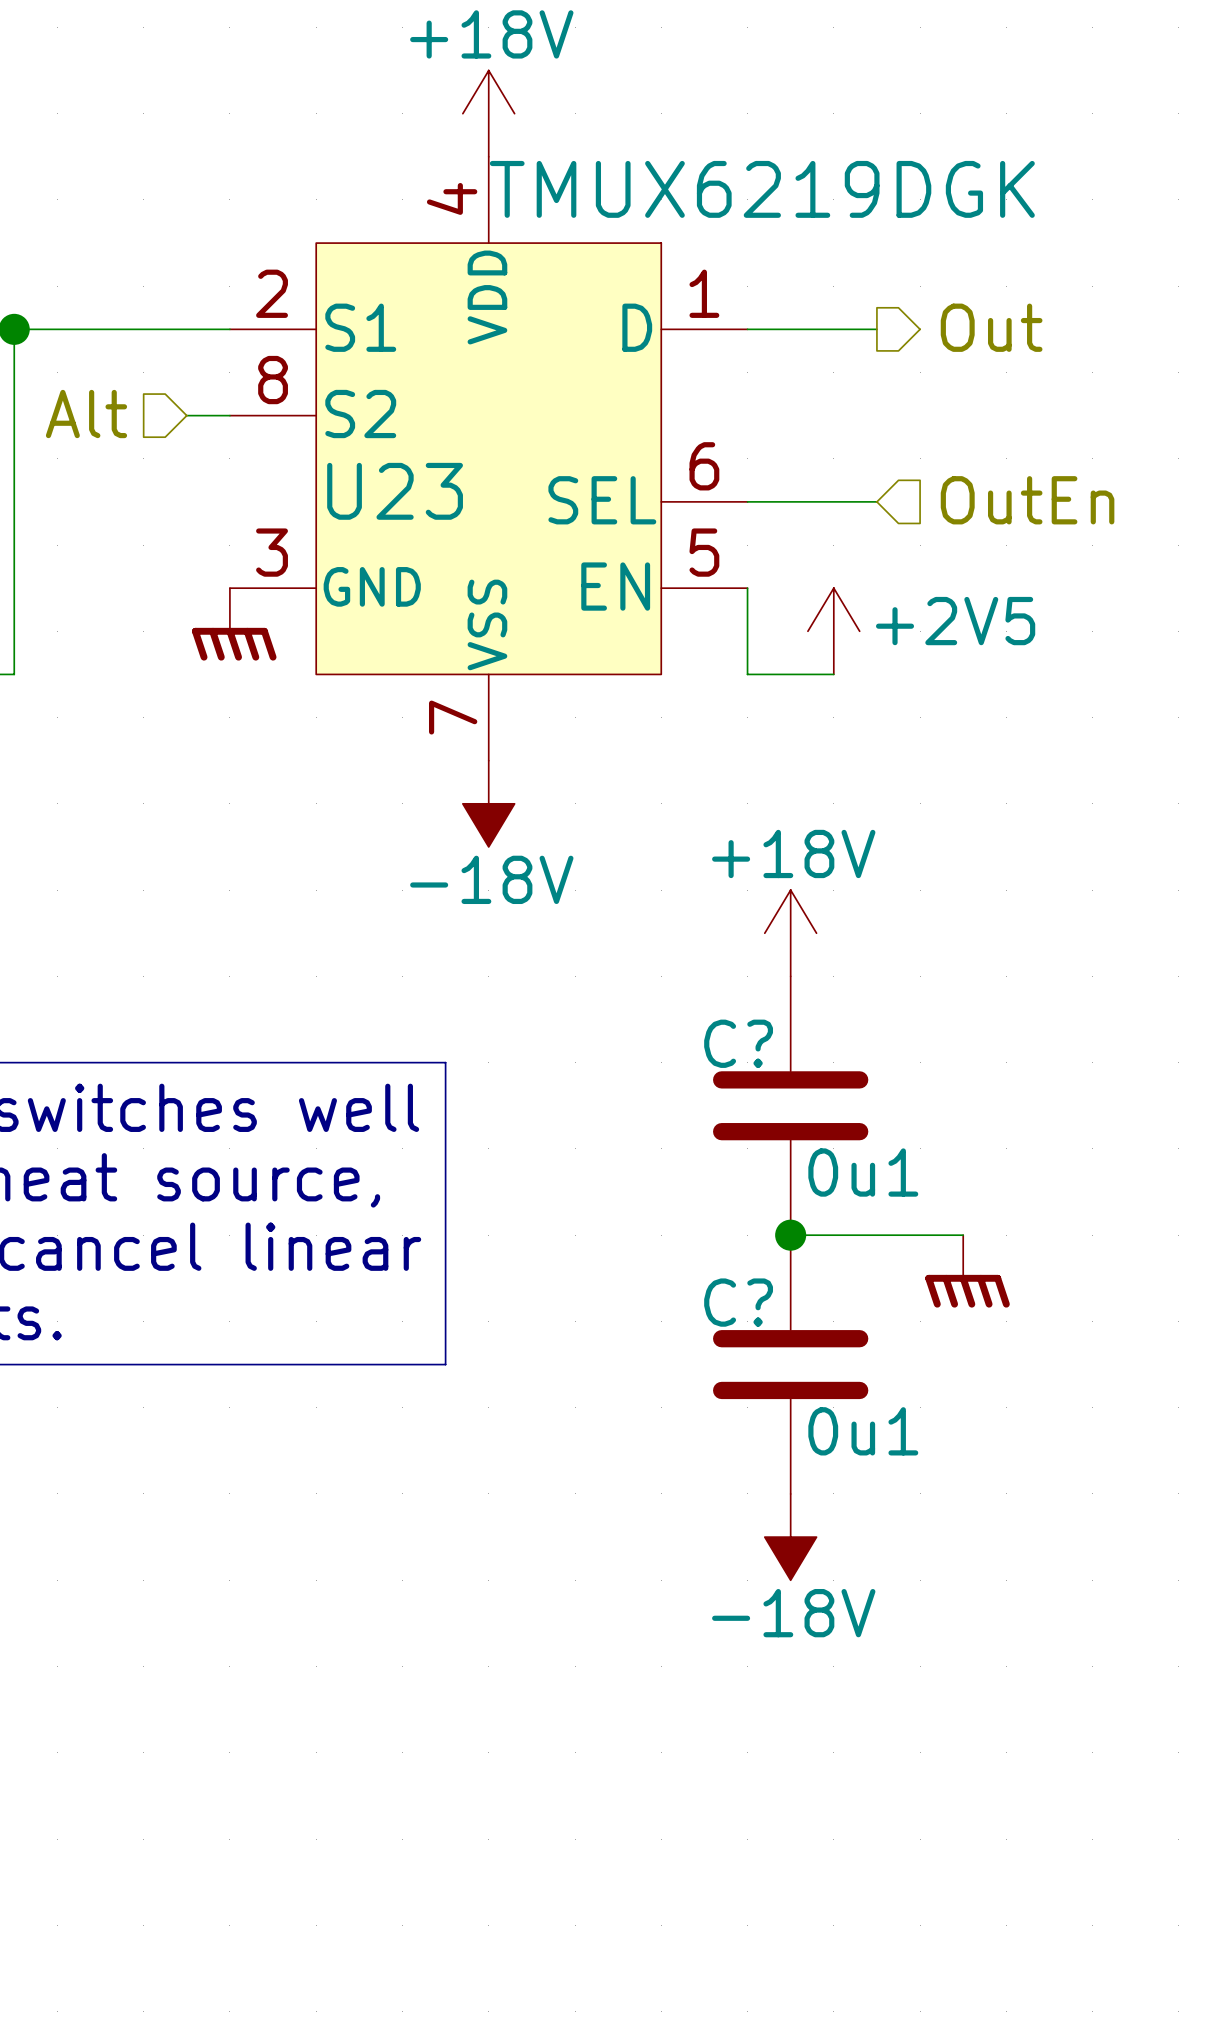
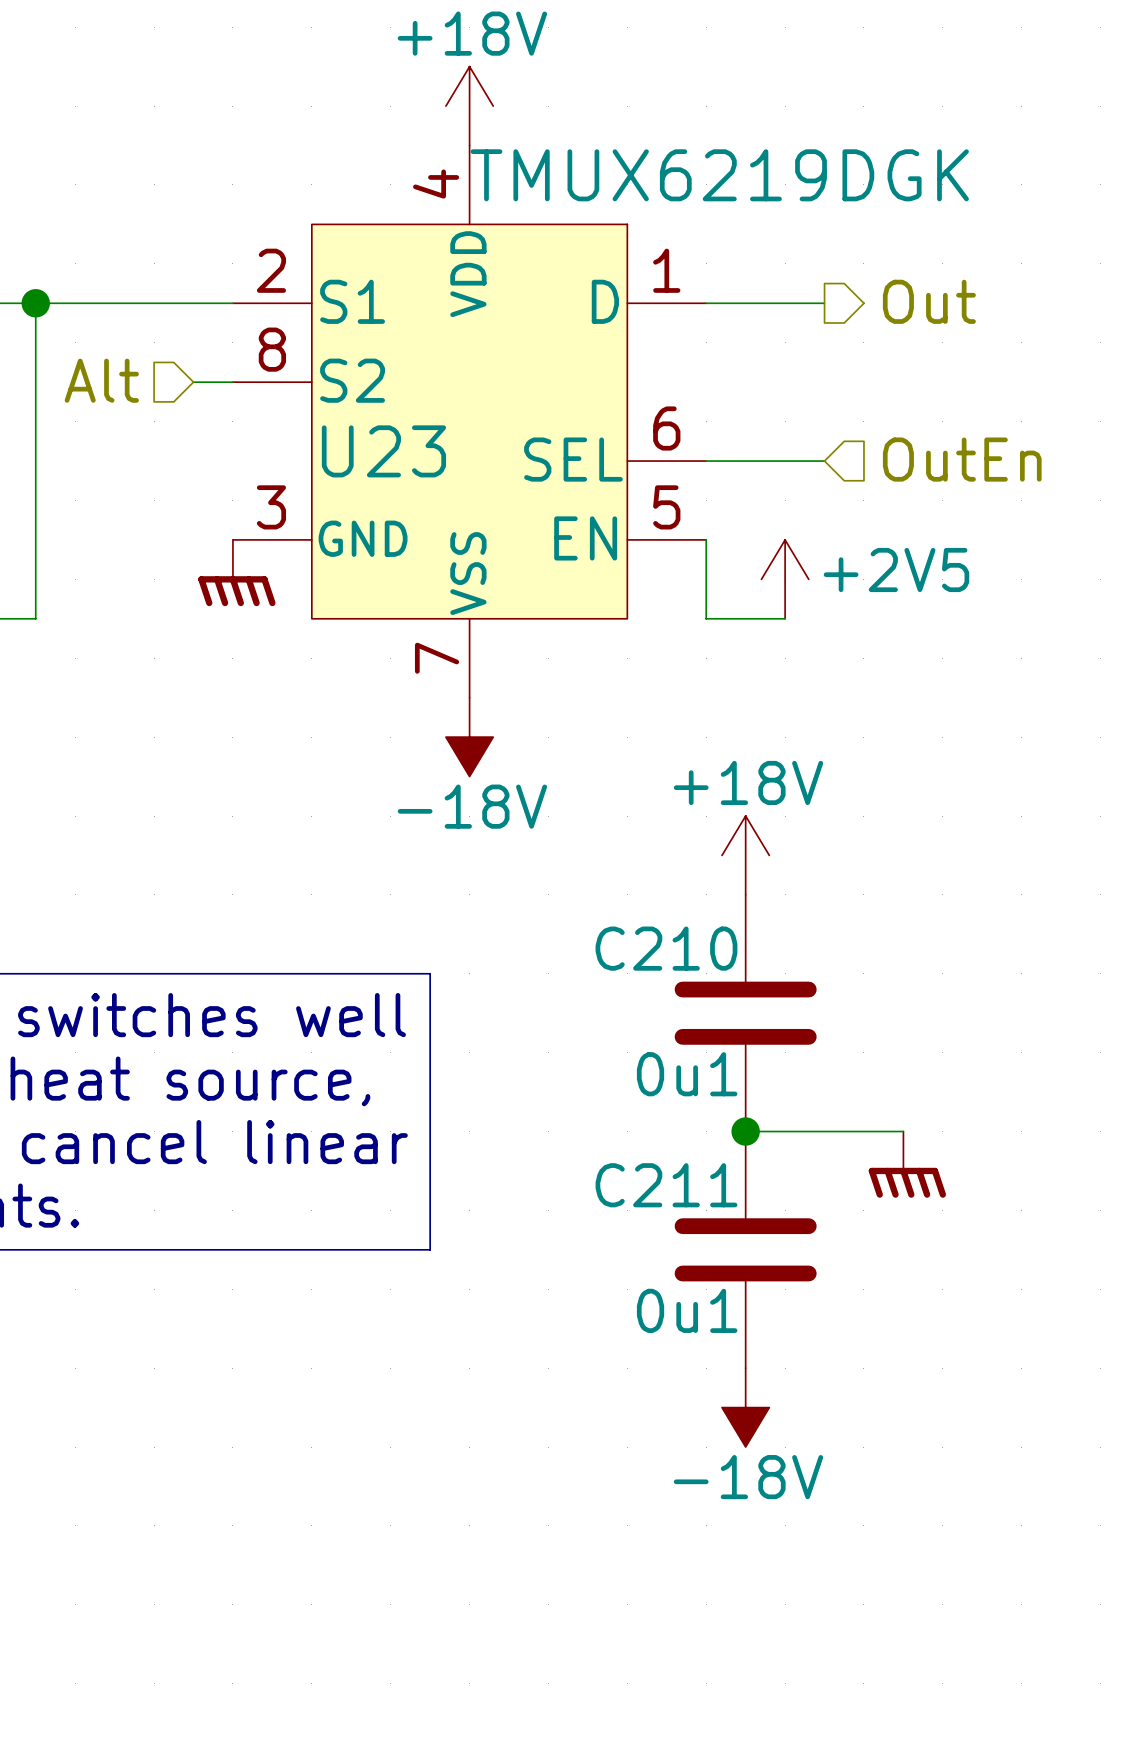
C? name: C? (738, 1043) -> C210 (666, 948)
C? value position: 0u1 (863, 1172) -> 0u1 (687, 1074)
C? name: C? (738, 1302) -> C211 (666, 1185)
C? value position: 0u1 (863, 1431) -> 0u1 (687, 1310)

